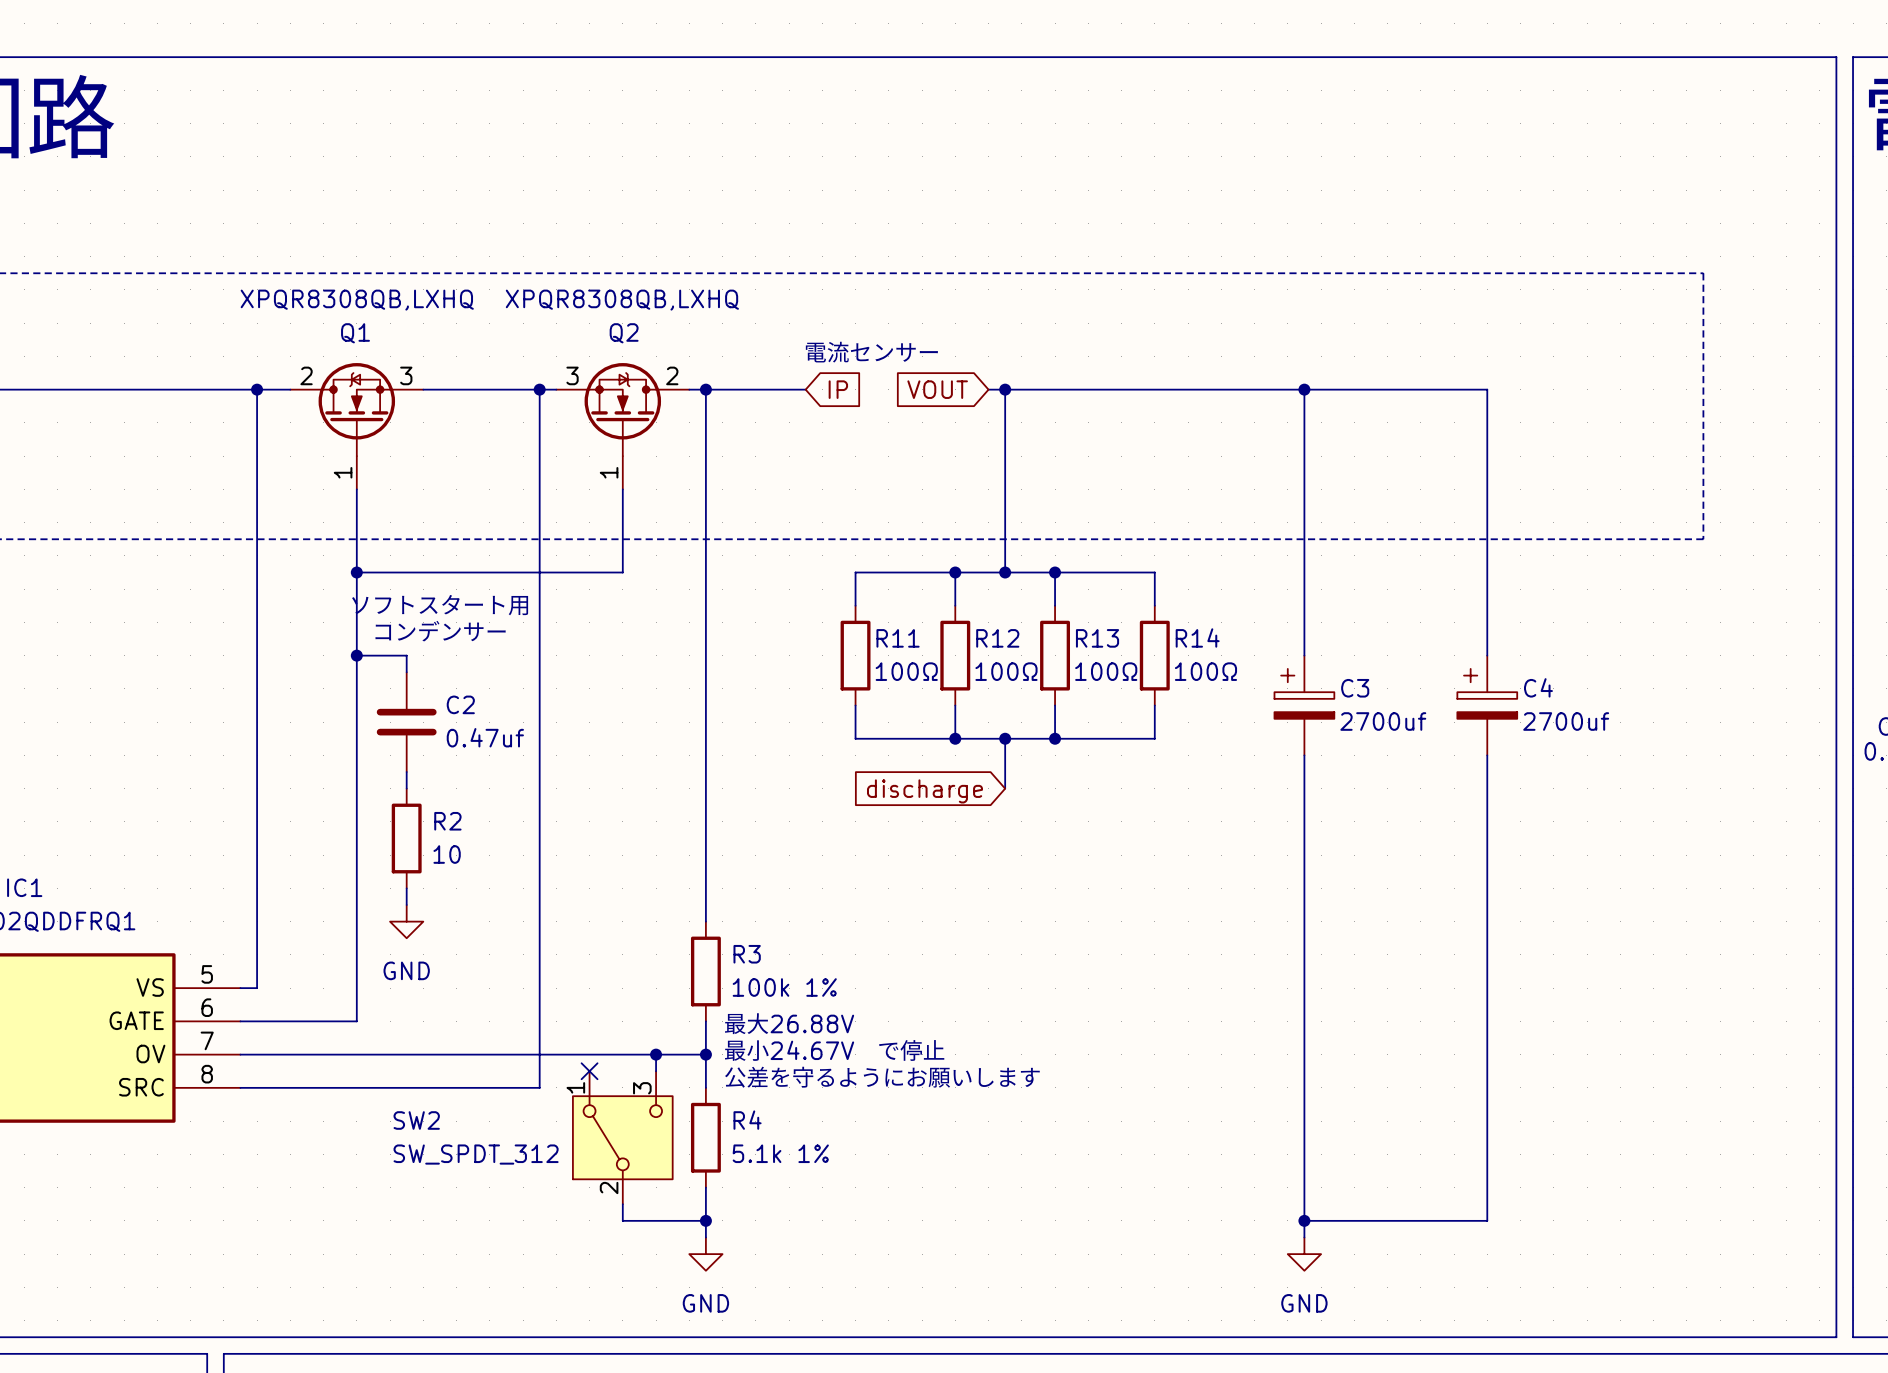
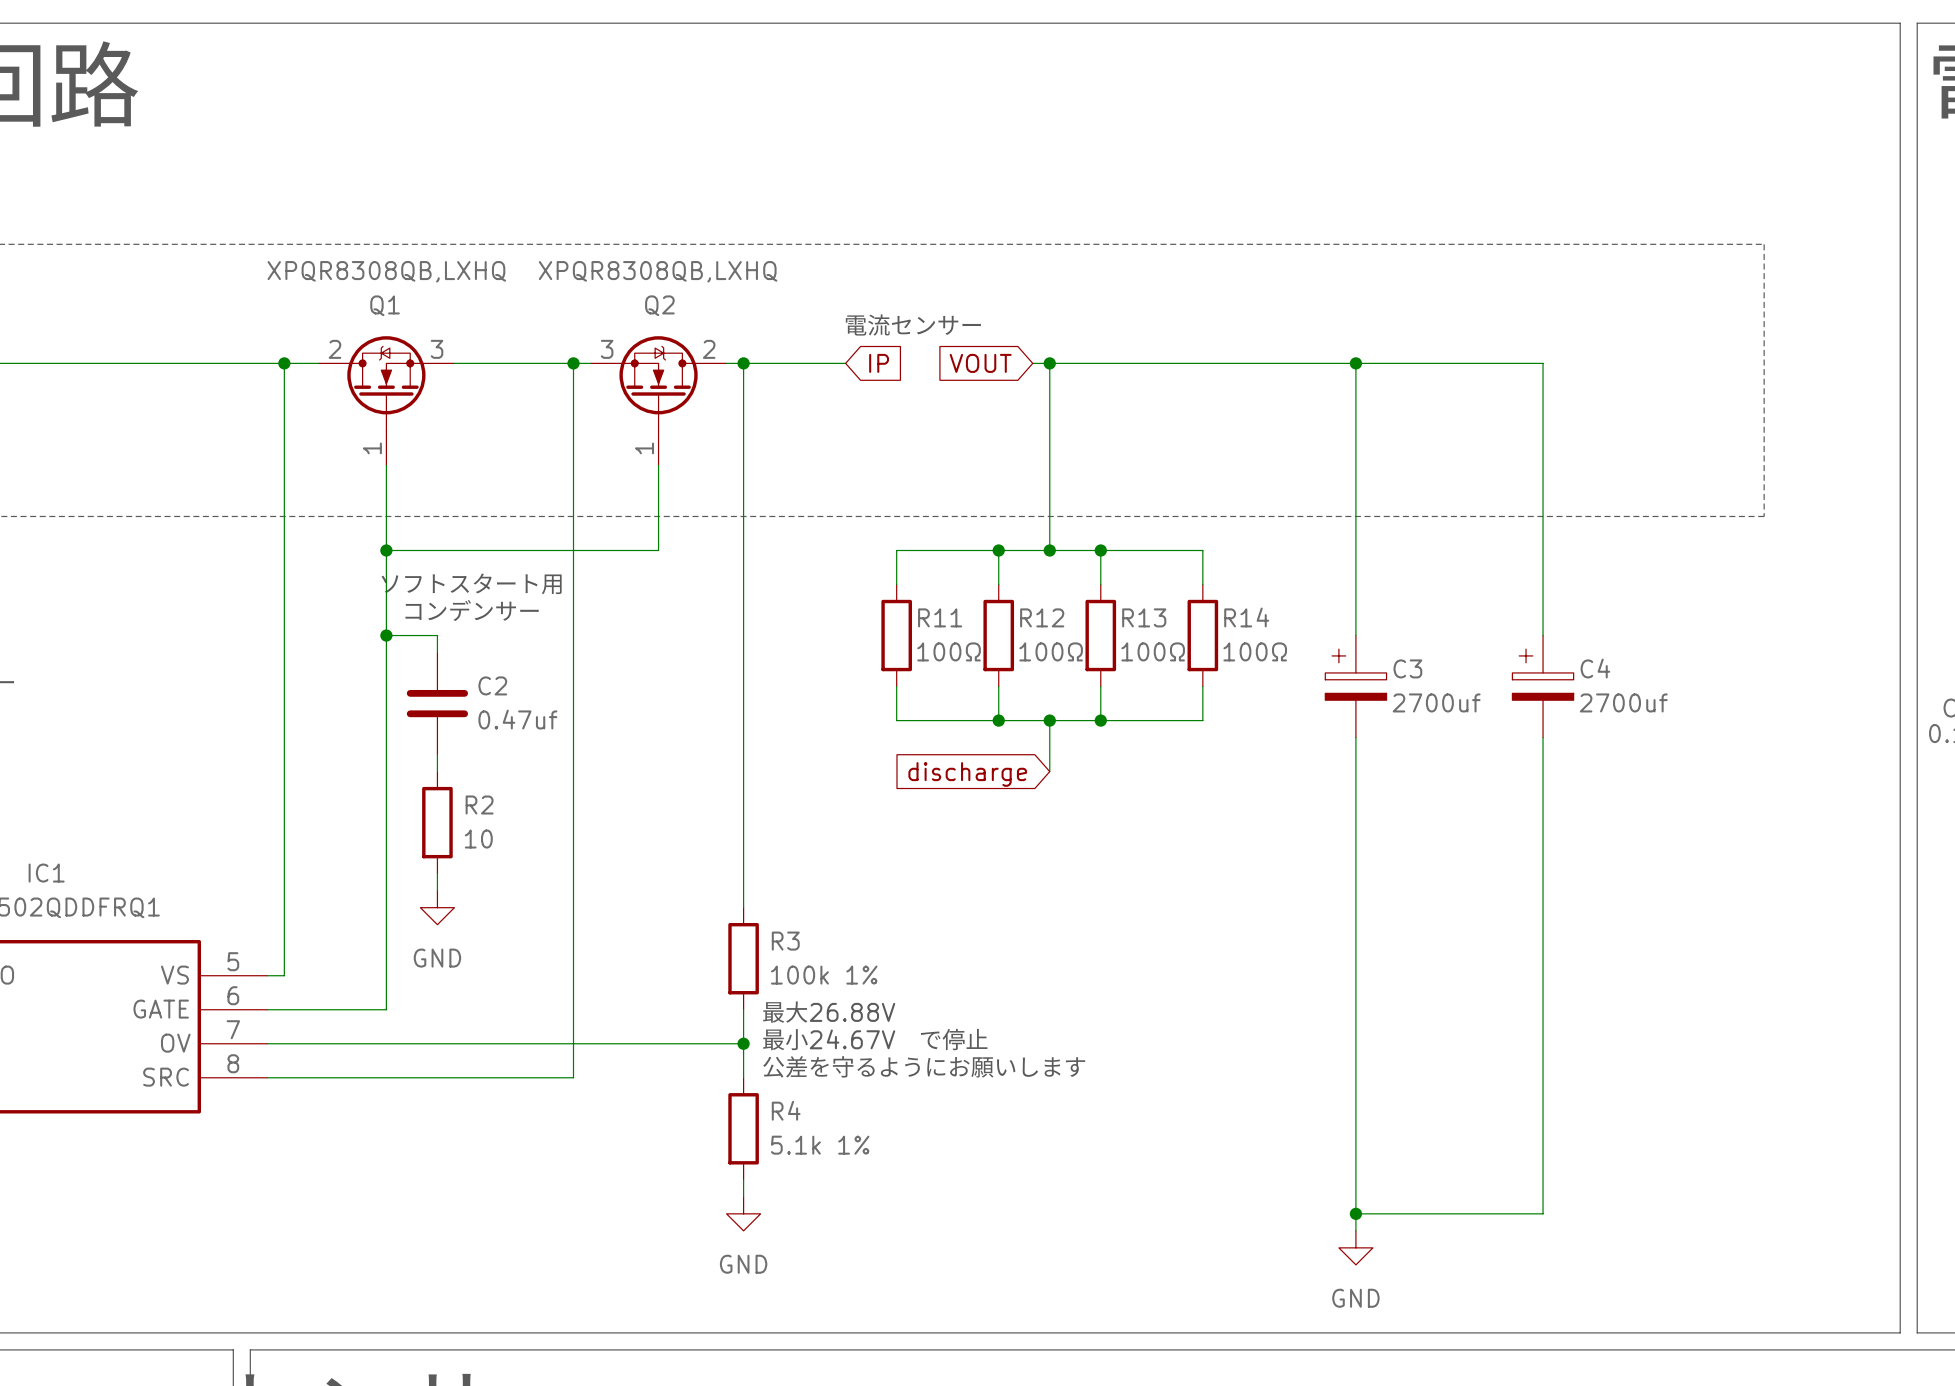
wire: (656, 1054) (656, 1071) -> none
junction: (656, 1054) -> none
no-connect mark: (589, 1071) -> none
SW2: SW_SPDT_312 (622, 1137) -> none
wire: (622, 1204) (622, 1220) (705, 1220) -> none
junction: (705, 1220) -> none
power symbol position: GND (705, 1254) -> GND (743, 1213)

